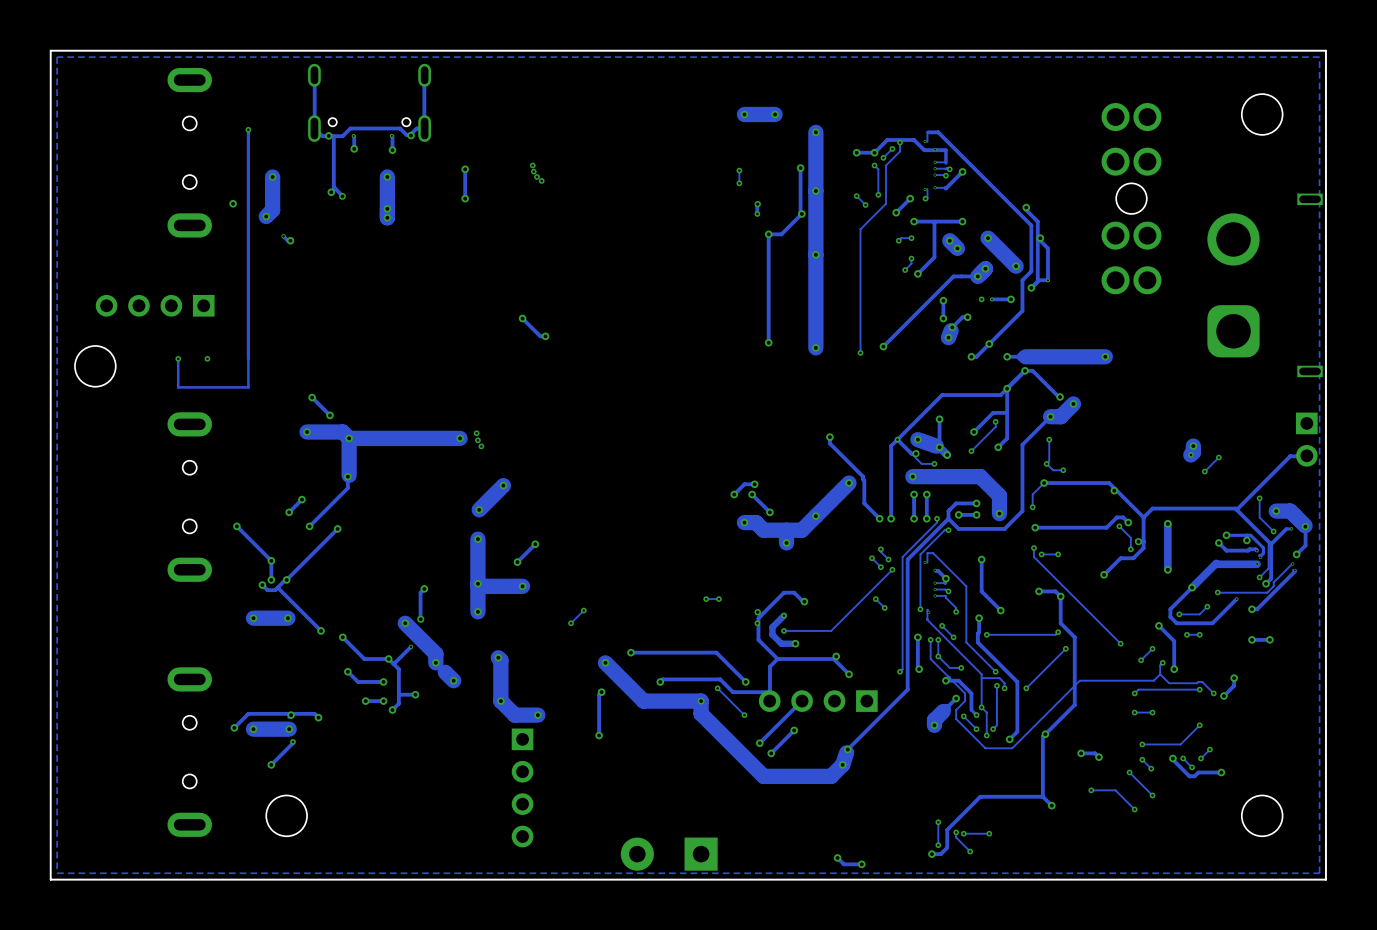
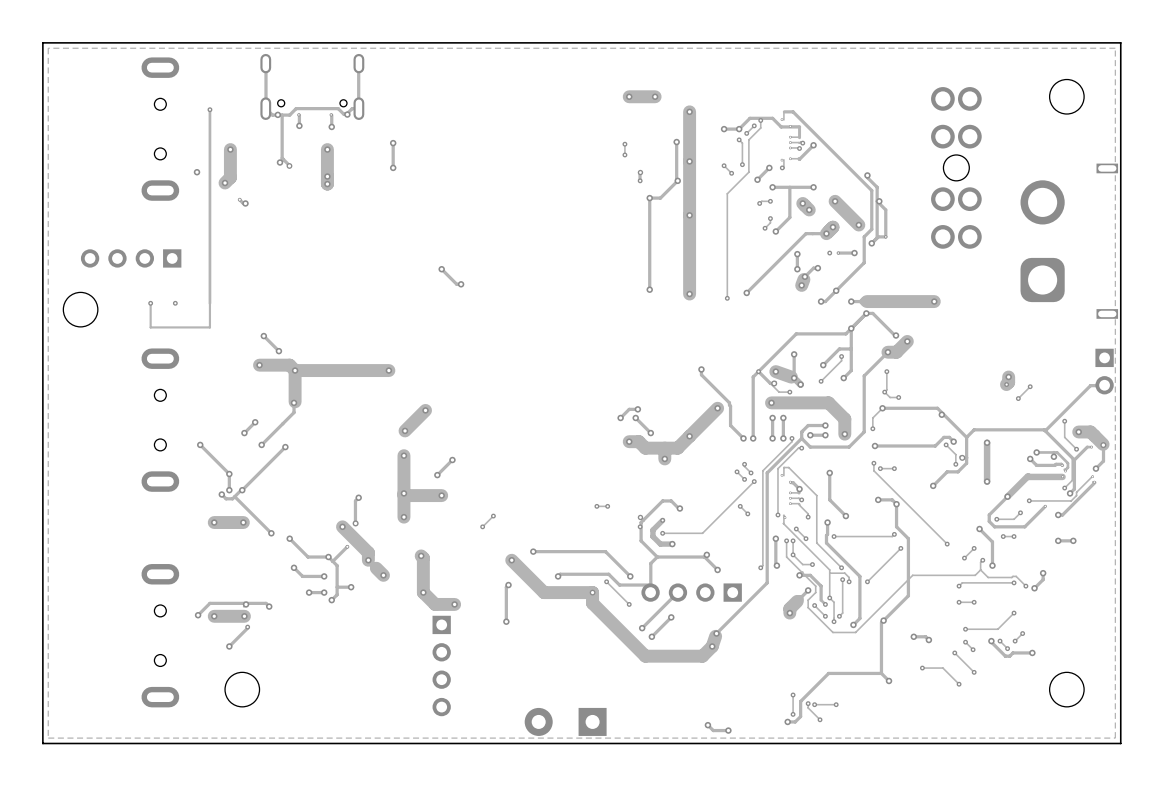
via: (532, 165) -> none
via: (533, 171) -> none
via: (536, 176) -> none
via: (541, 180) -> none
via: (476, 433) -> none
via: (477, 440) -> none
via: (481, 446) -> none

